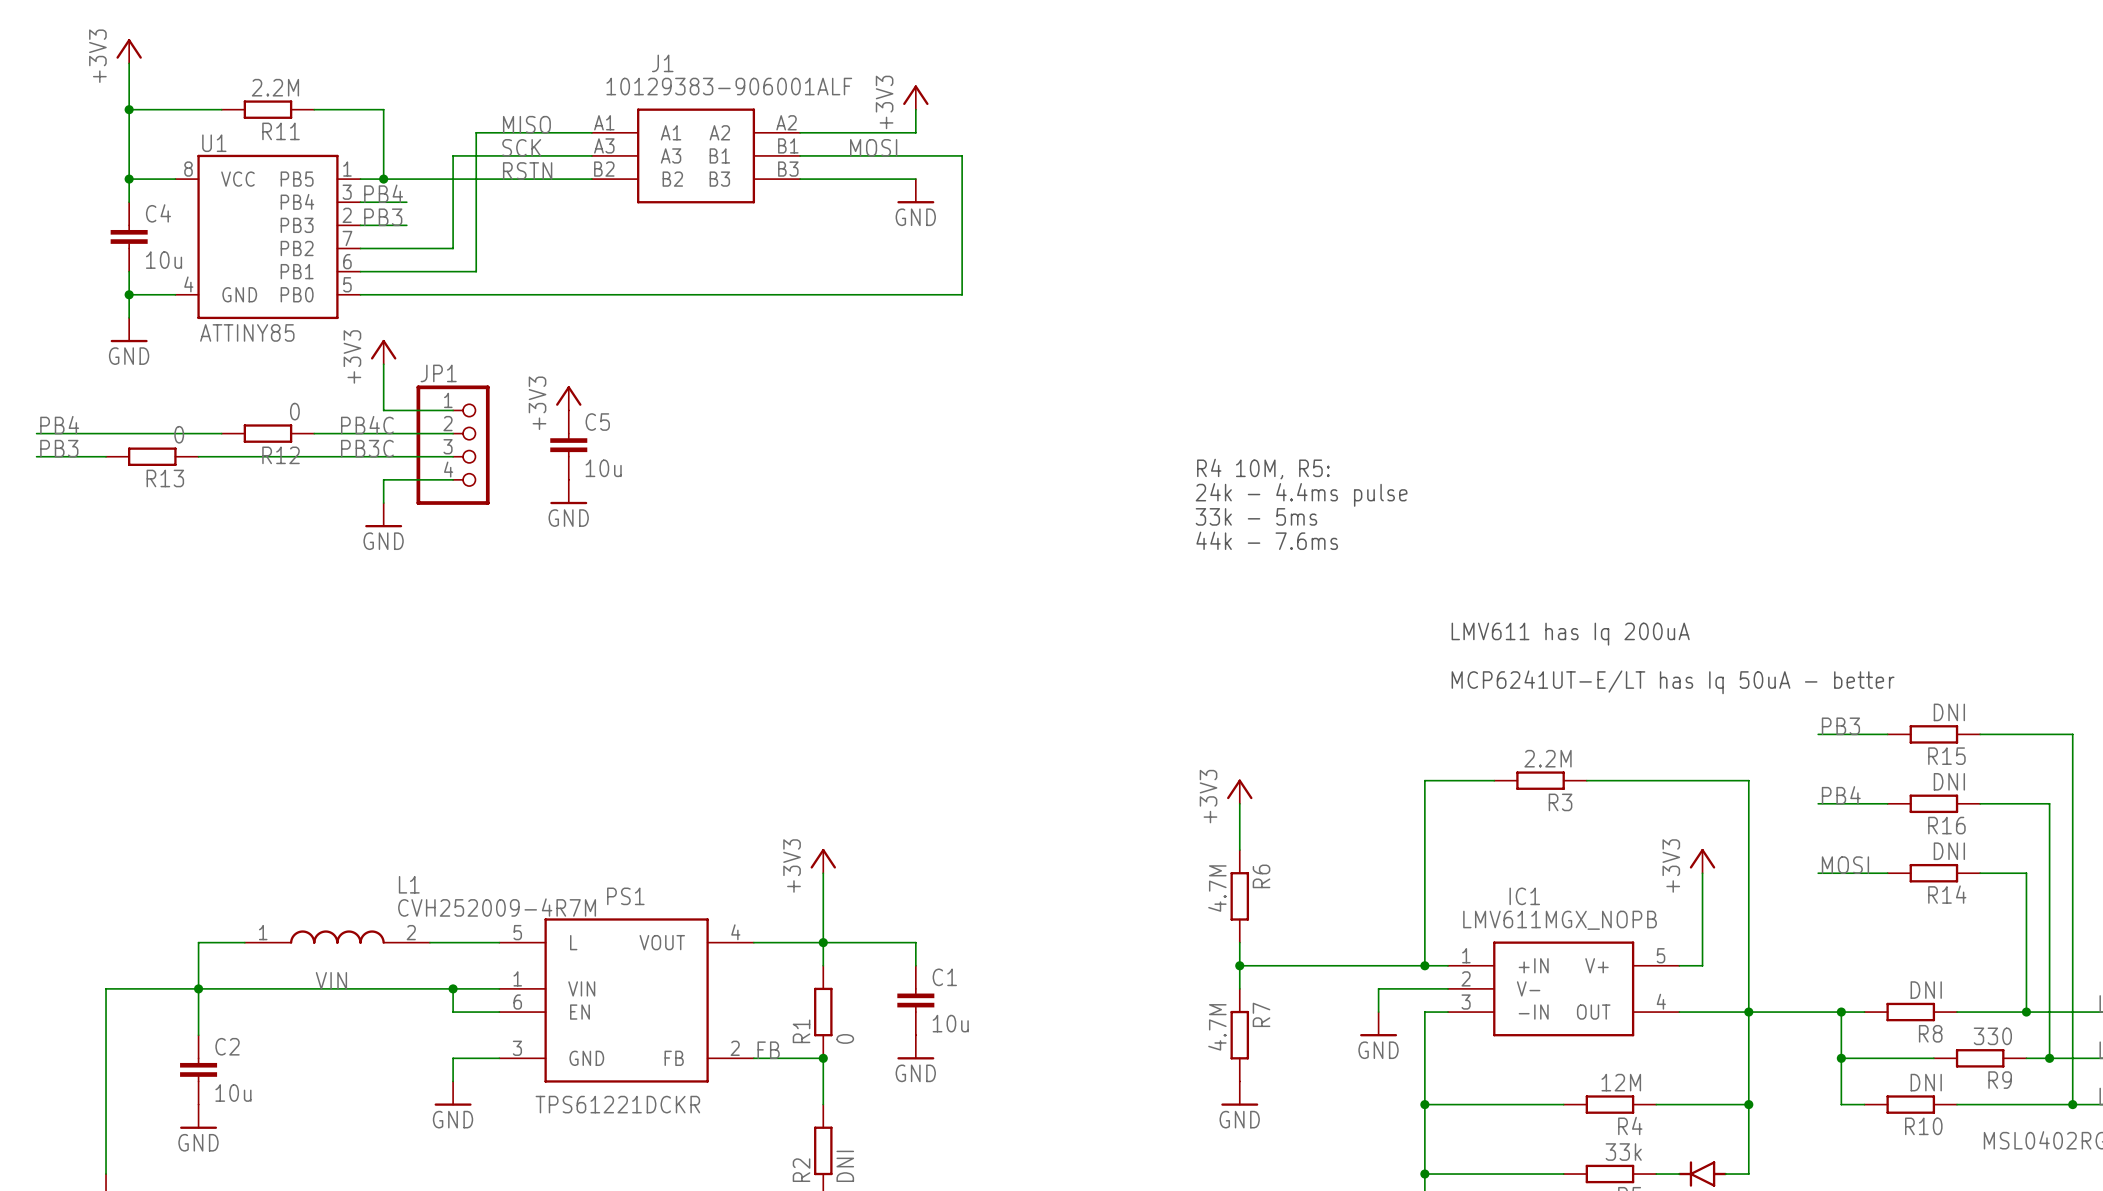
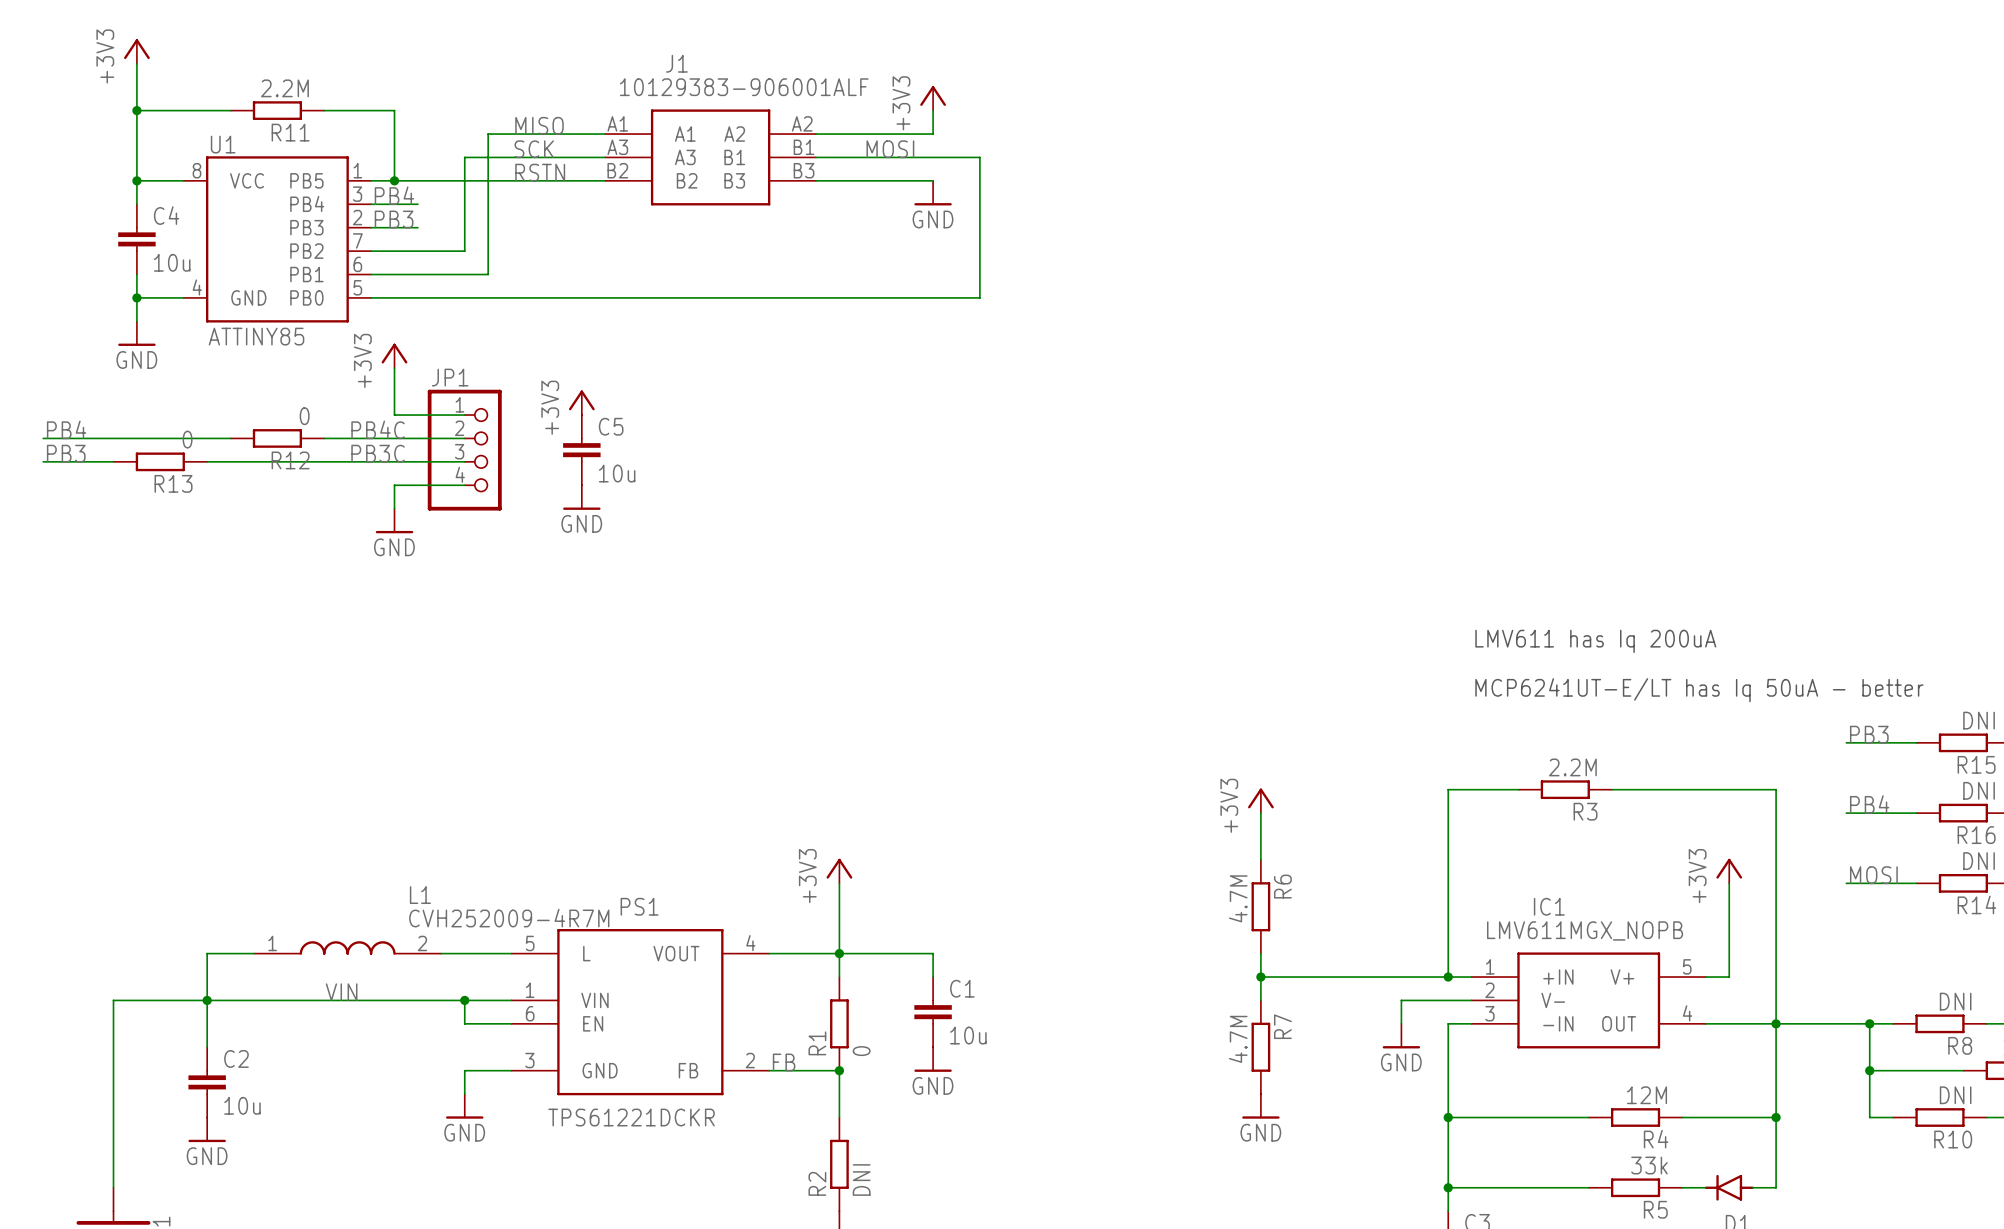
text: R4 10M, R5: (1263, 469) -> none
text: 24k - 4.4ms pulse (1301, 494) -> none
text: 33k - 5ms (1256, 516) -> none
text: 44k - 7.6ms (1267, 540) -> none

